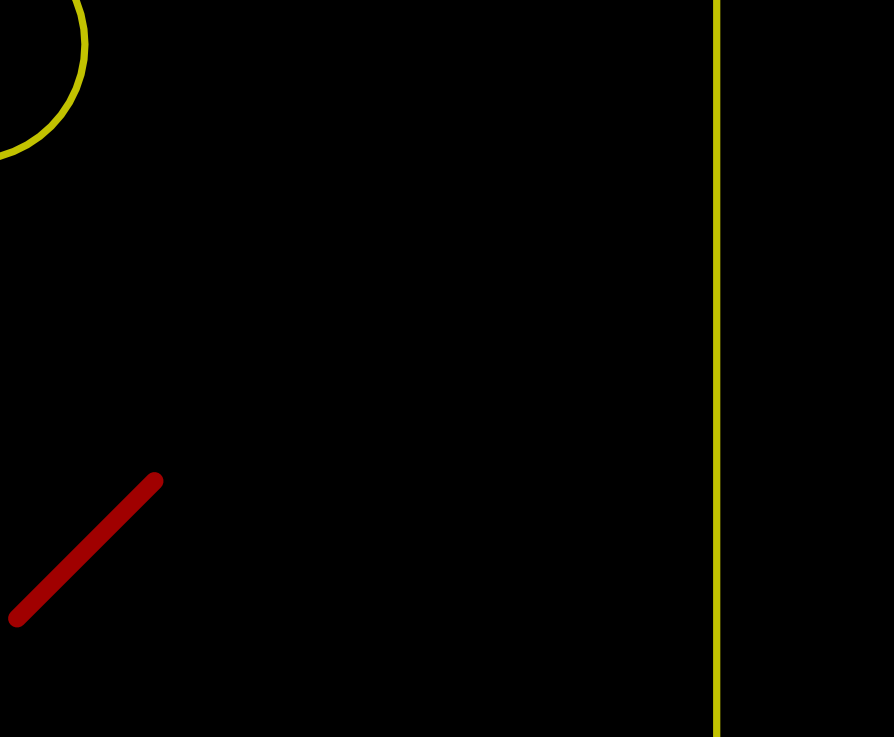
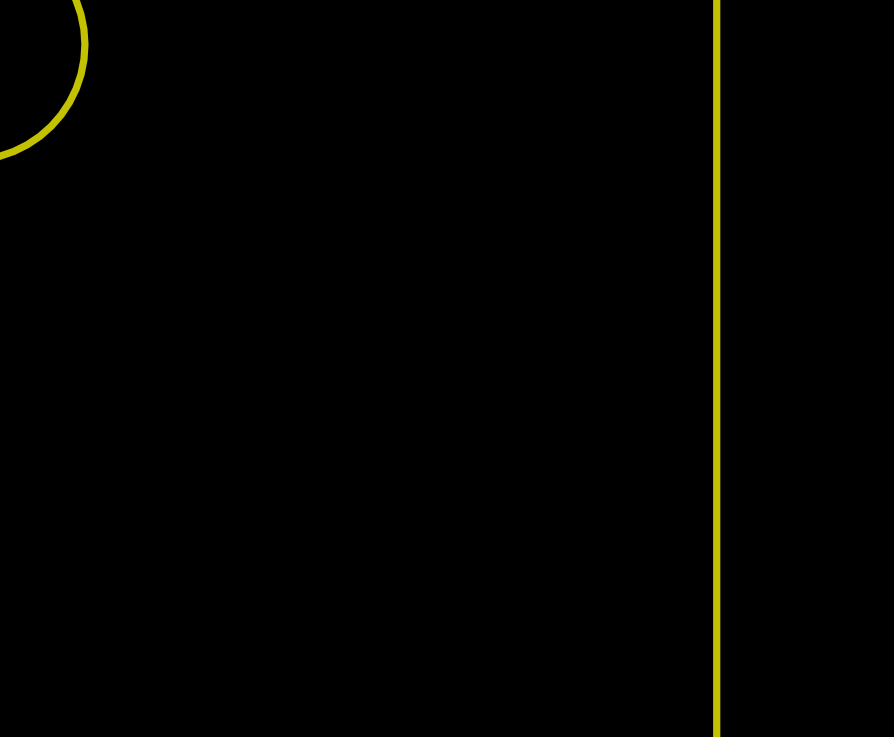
track: (154, 481) (17, 618) -> none

